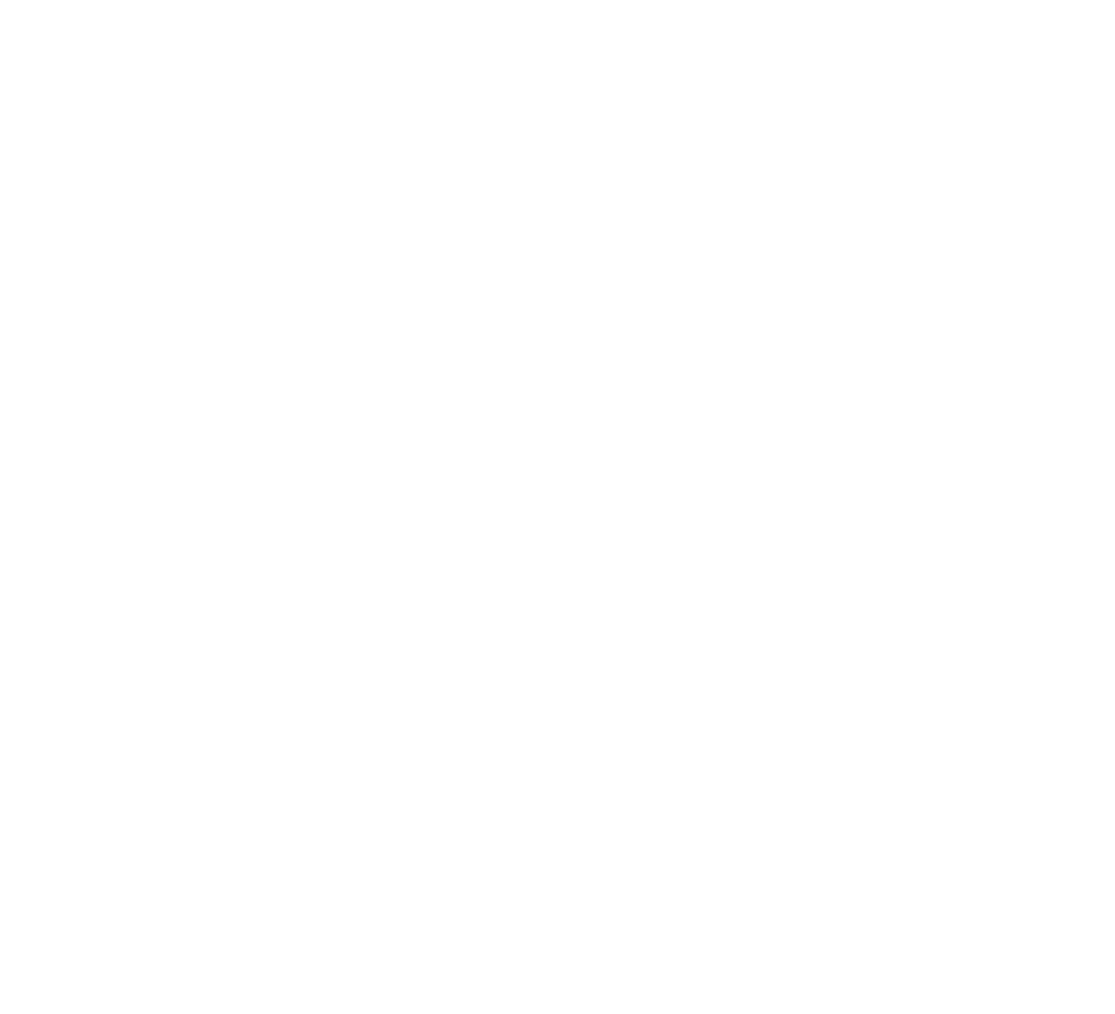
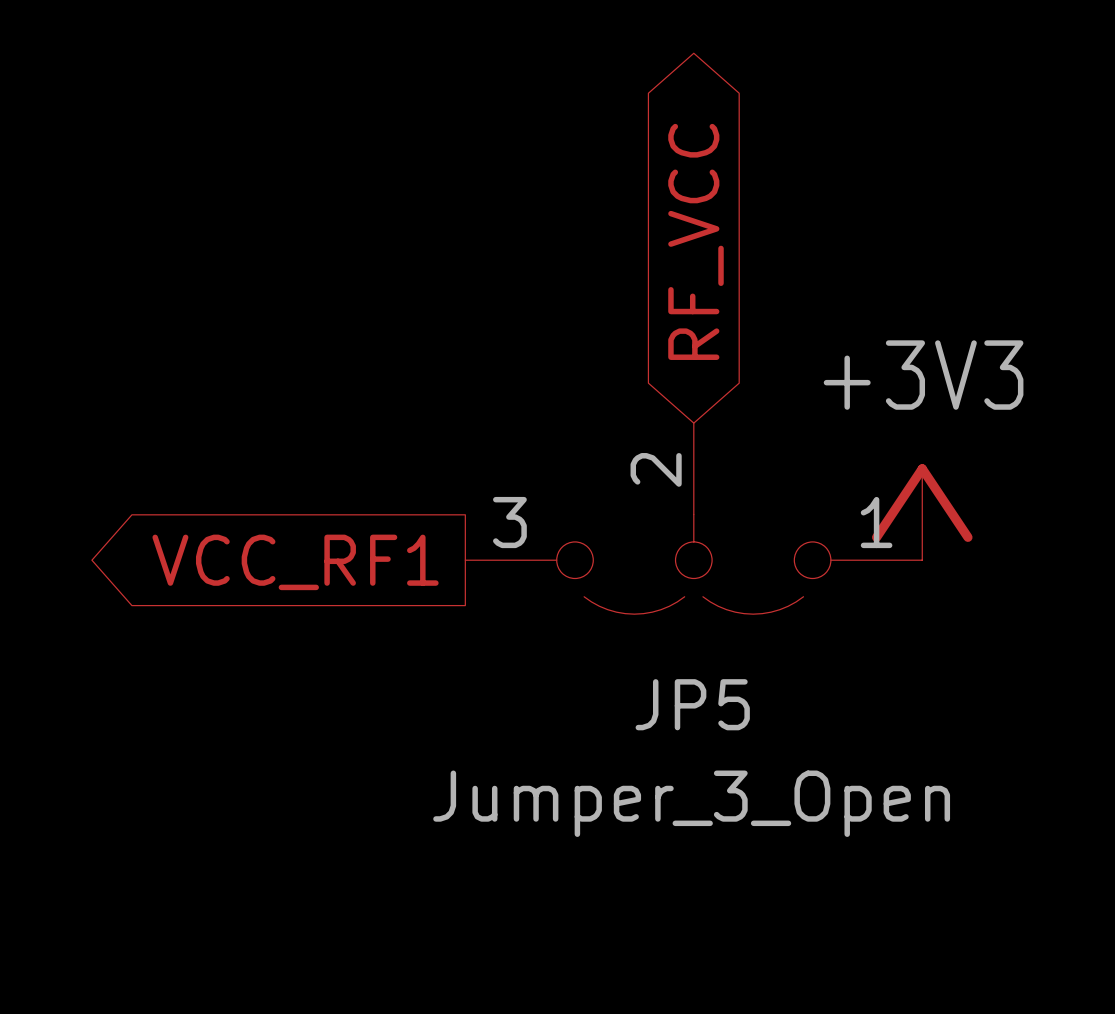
global label: none -> RF_VCC (695, 241)
power symbol: none -> +3V3 (922, 512)
JP5: none -> Jumper_3_Open (693, 518)
global label: none -> VCC_RF1 (295, 562)

